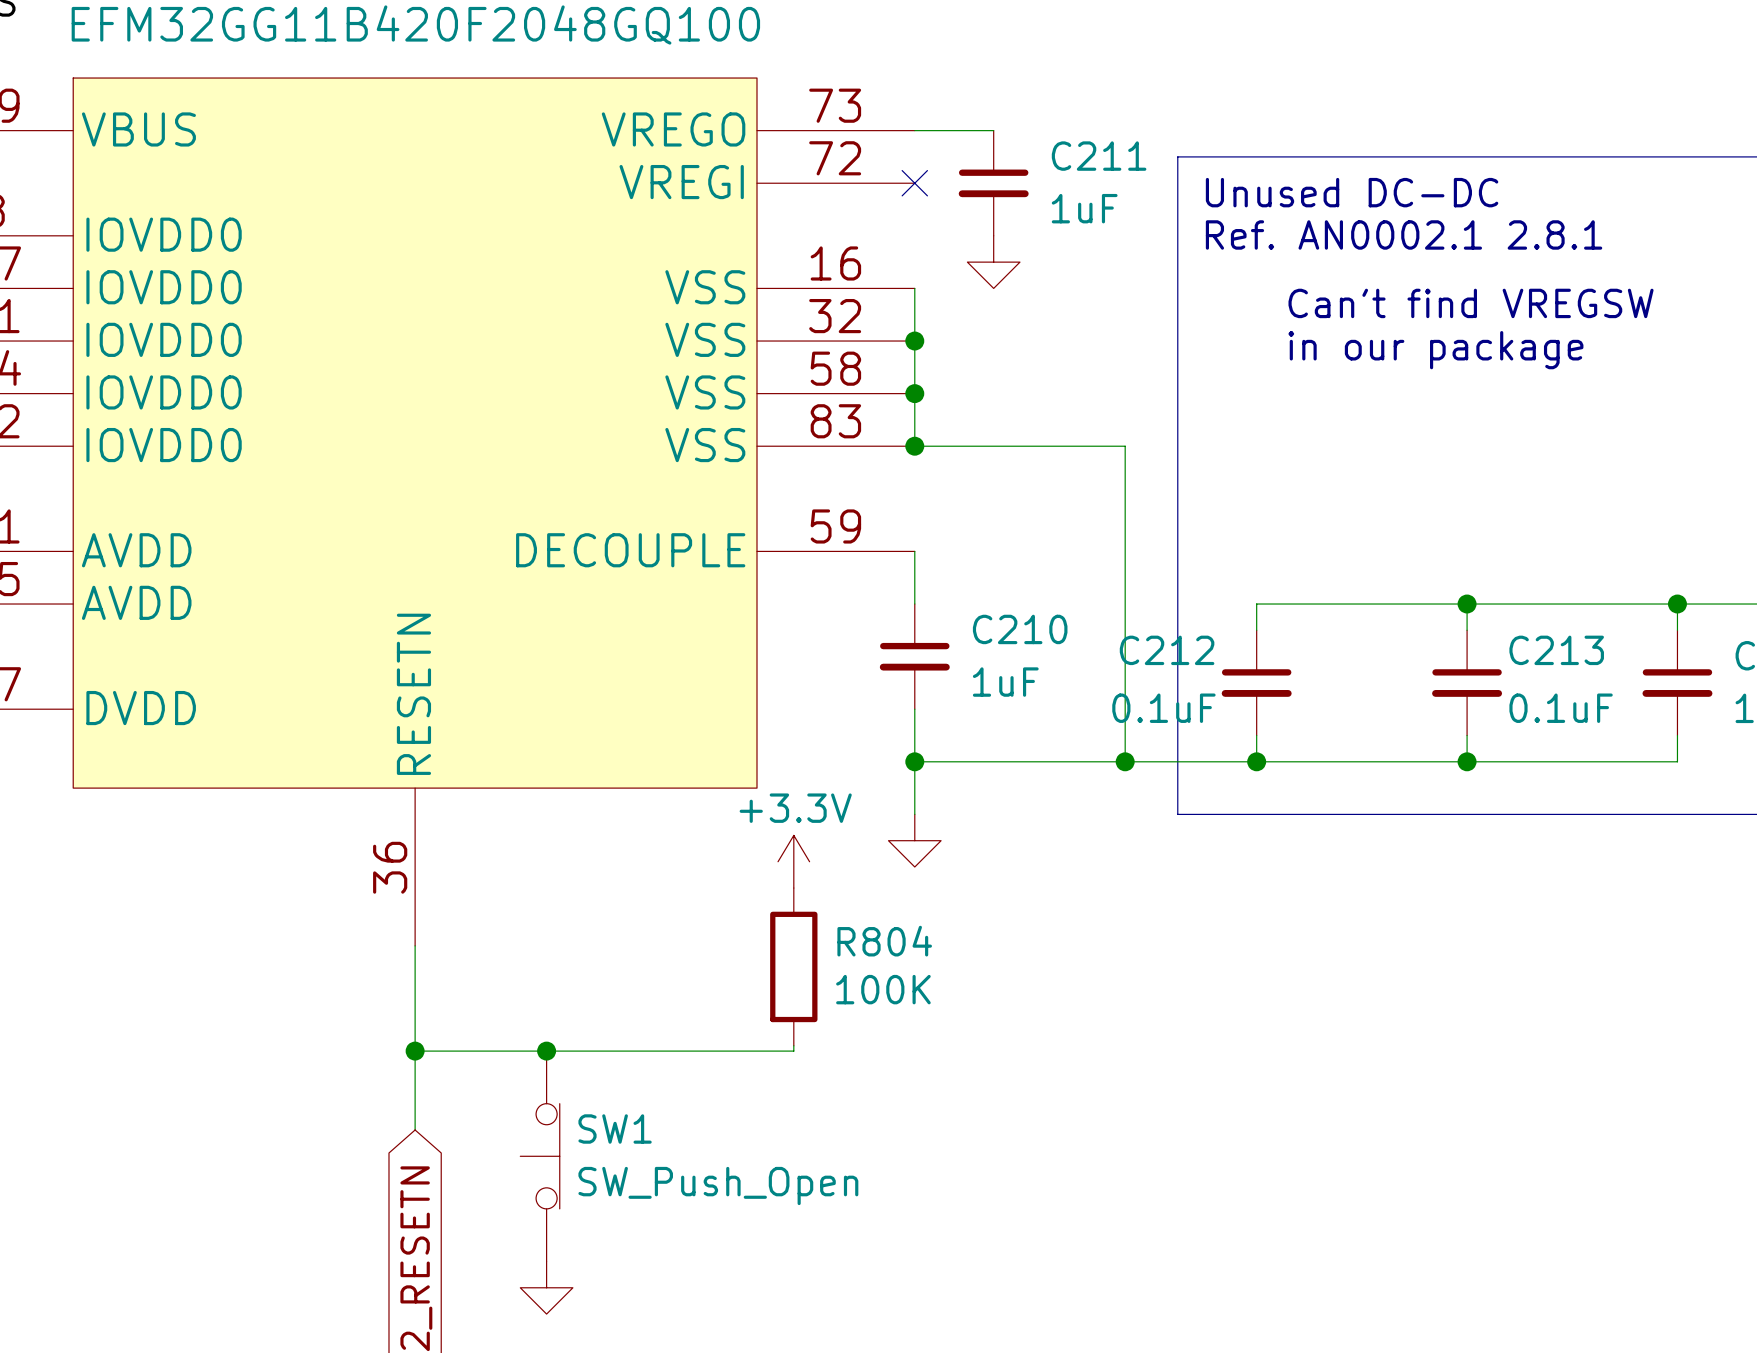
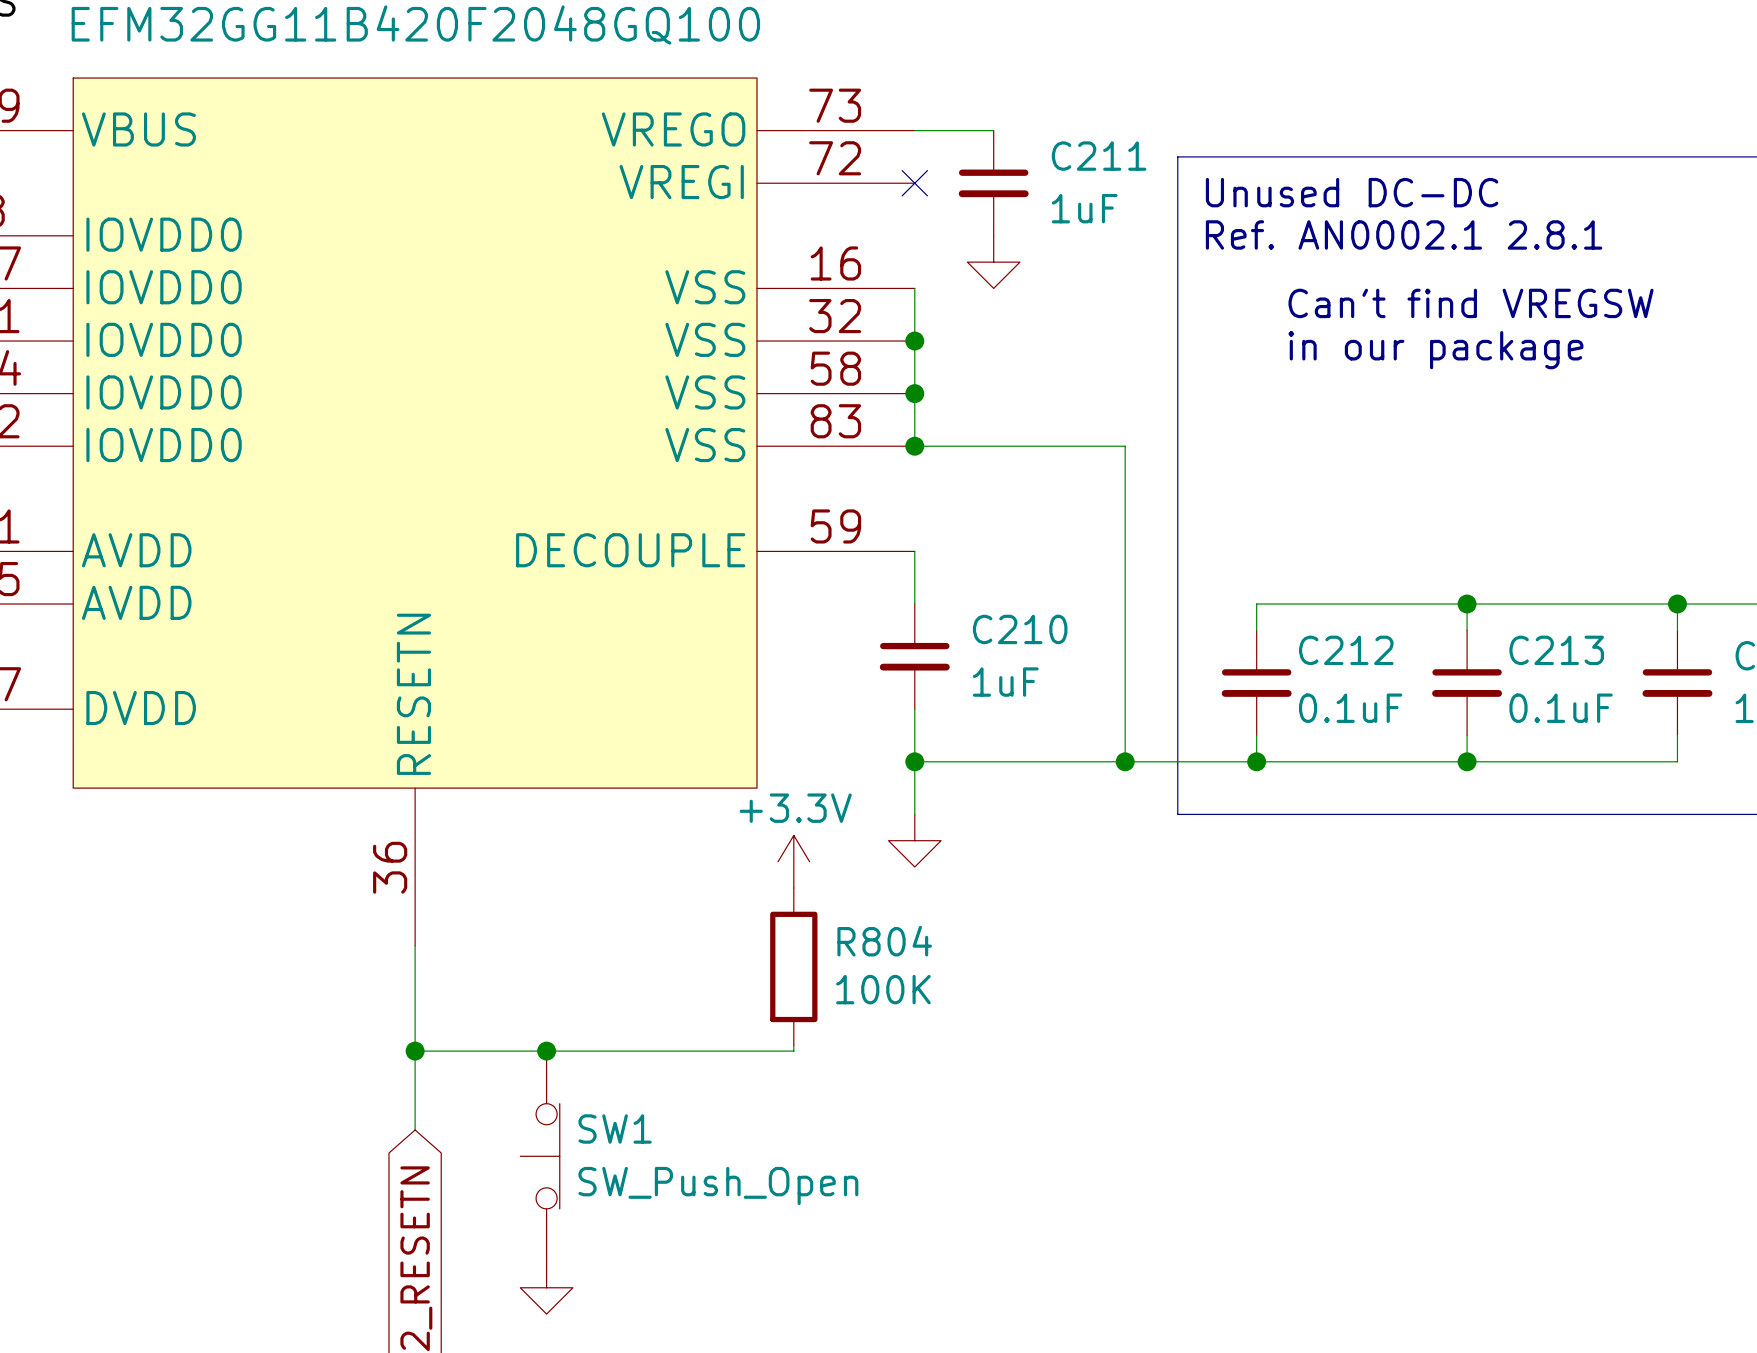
C212 name position: C212 (1167, 650) -> C212 (1346, 650)
C212 value position: 0.1uF (1163, 708) -> 0.1uF (1350, 708)

